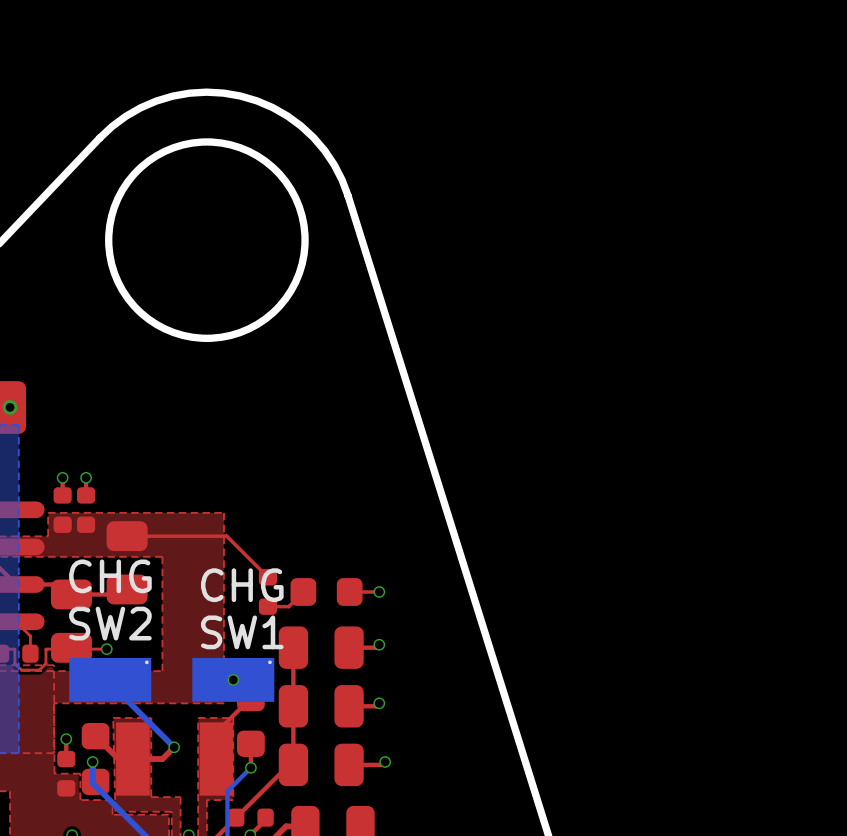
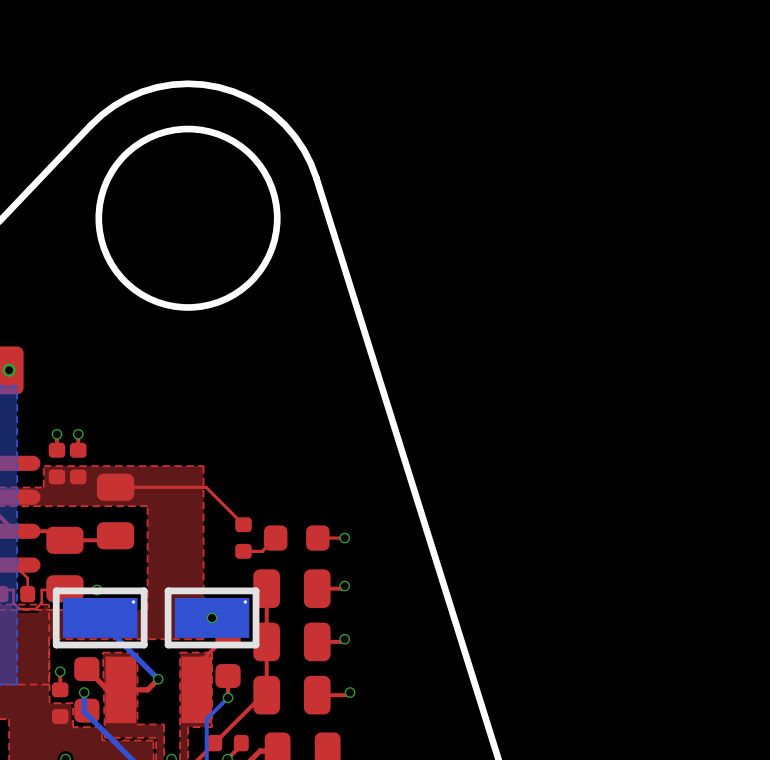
text: CHG (110, 576) -> none
text: CHG (242, 585) -> none
text: SW2 (110, 623) -> none
text: SW1 (242, 632) -> none
part footprint: [69, 657, 152, 702] -> [52, 587, 148, 649]
part footprint: [192, 657, 275, 702] -> [164, 587, 260, 649]

